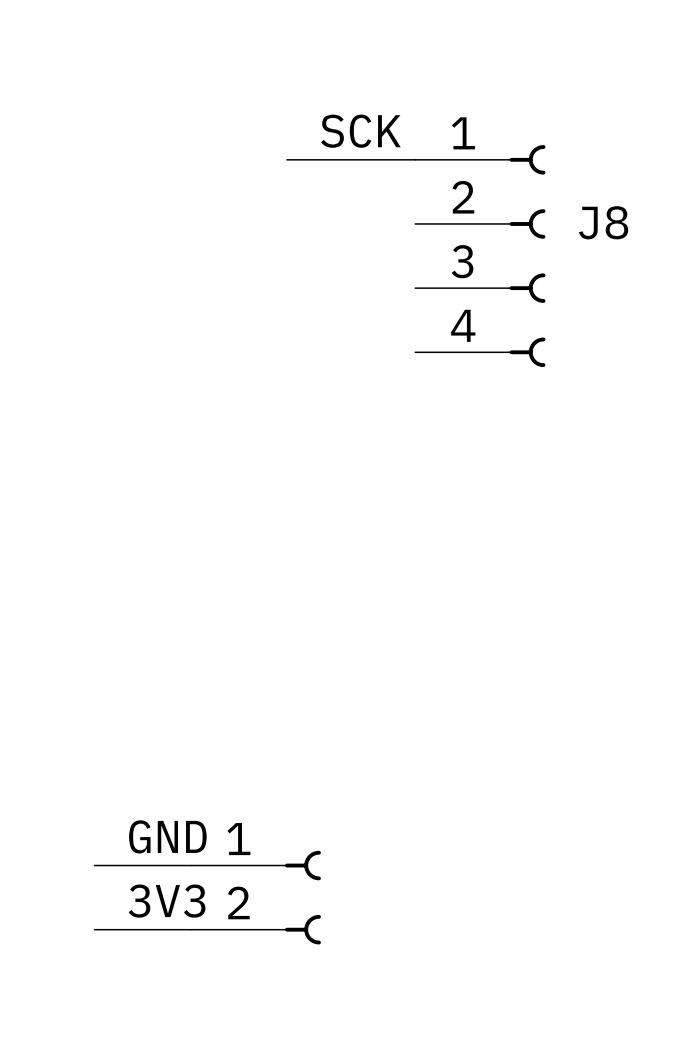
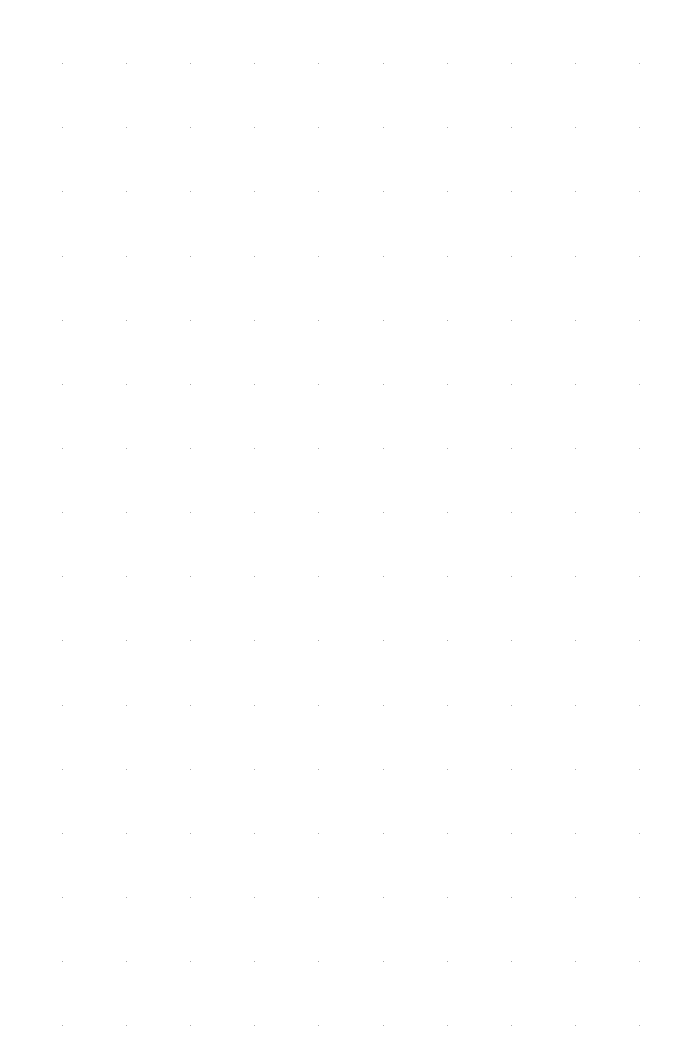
label: SCK (360, 131) -> none
wire: (286, 159) (415, 159) -> none
J8: (480, 256) -> none
label: GND (167, 836) -> none
wire: (94, 865) (190, 865) -> none
part: (255, 897) -> none
label: 3V3 (167, 901) -> none
wire: (94, 929) (190, 929) -> none

